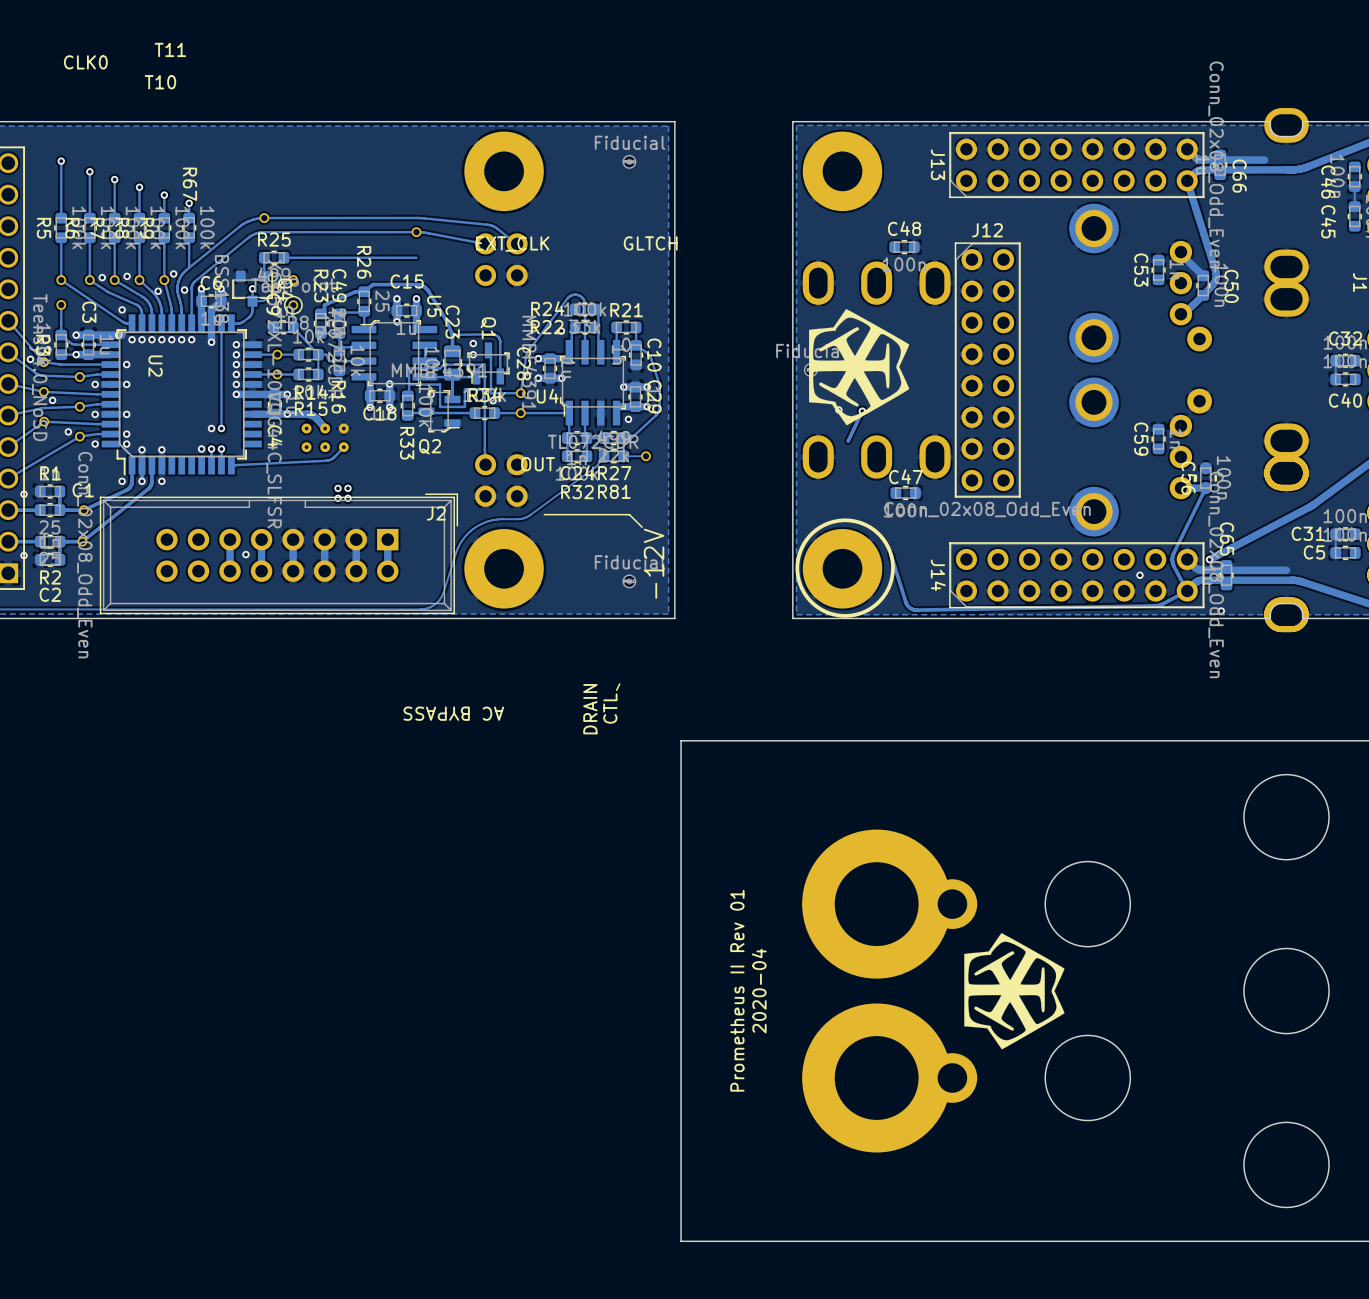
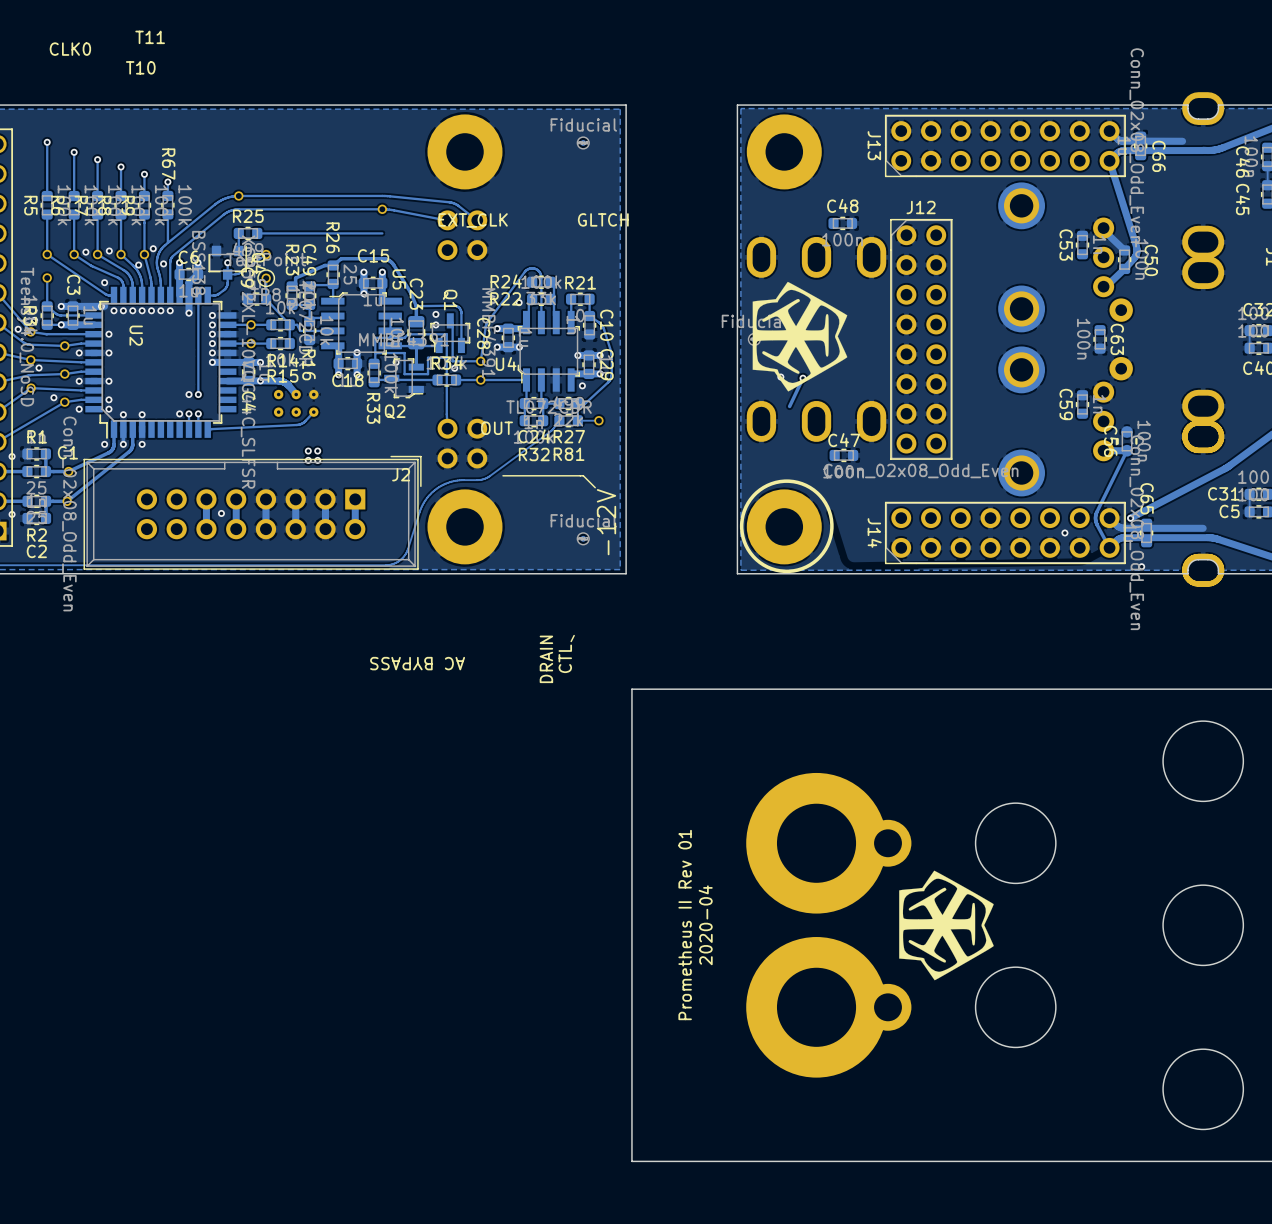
C63: none -> 100n (1100, 339)
track: (890, 553) (906, 604) (914, 609) (1155, 605) -> none
track: (1187, 591) (1155, 605) -> none

